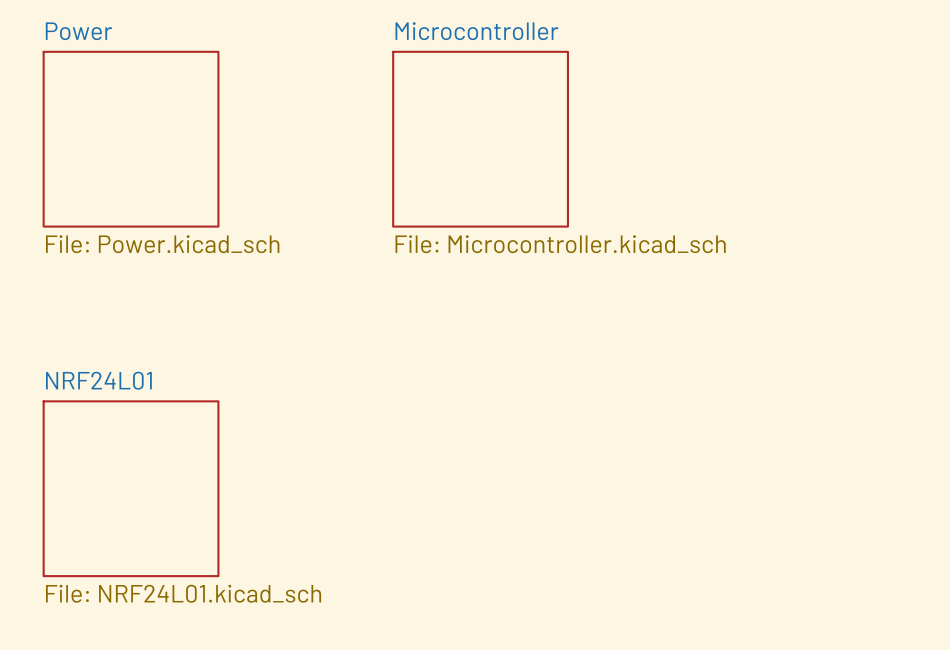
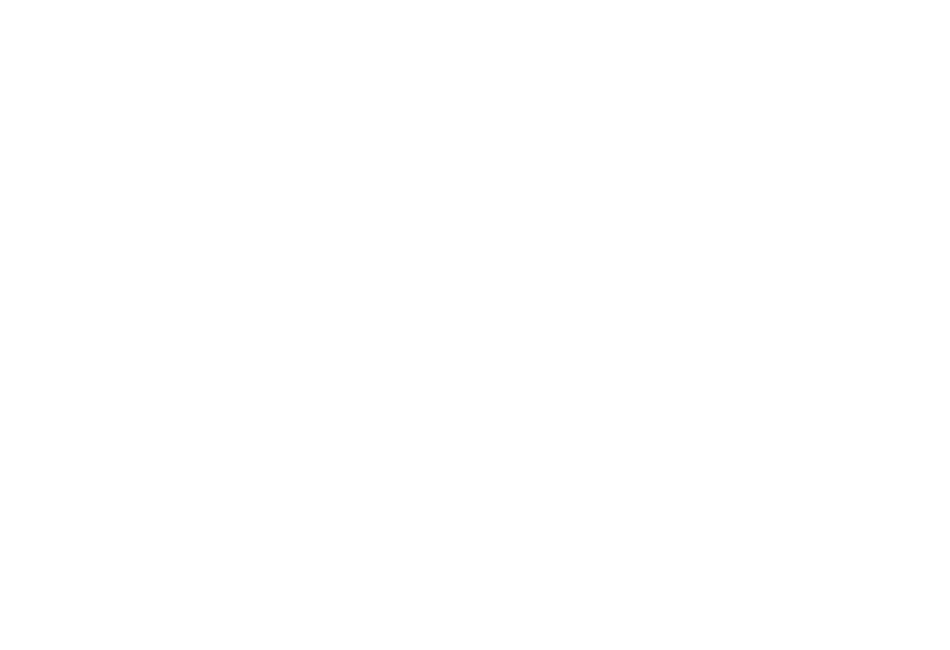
sheet Power: File: Power.kicad_sch (131, 139) -> none
sheet Microcontroller: File: Microcontroller.kicad_sch (480, 139) -> none
sheet NRF24L01: File: NRF24L01.kicad_sch (131, 488) -> none

